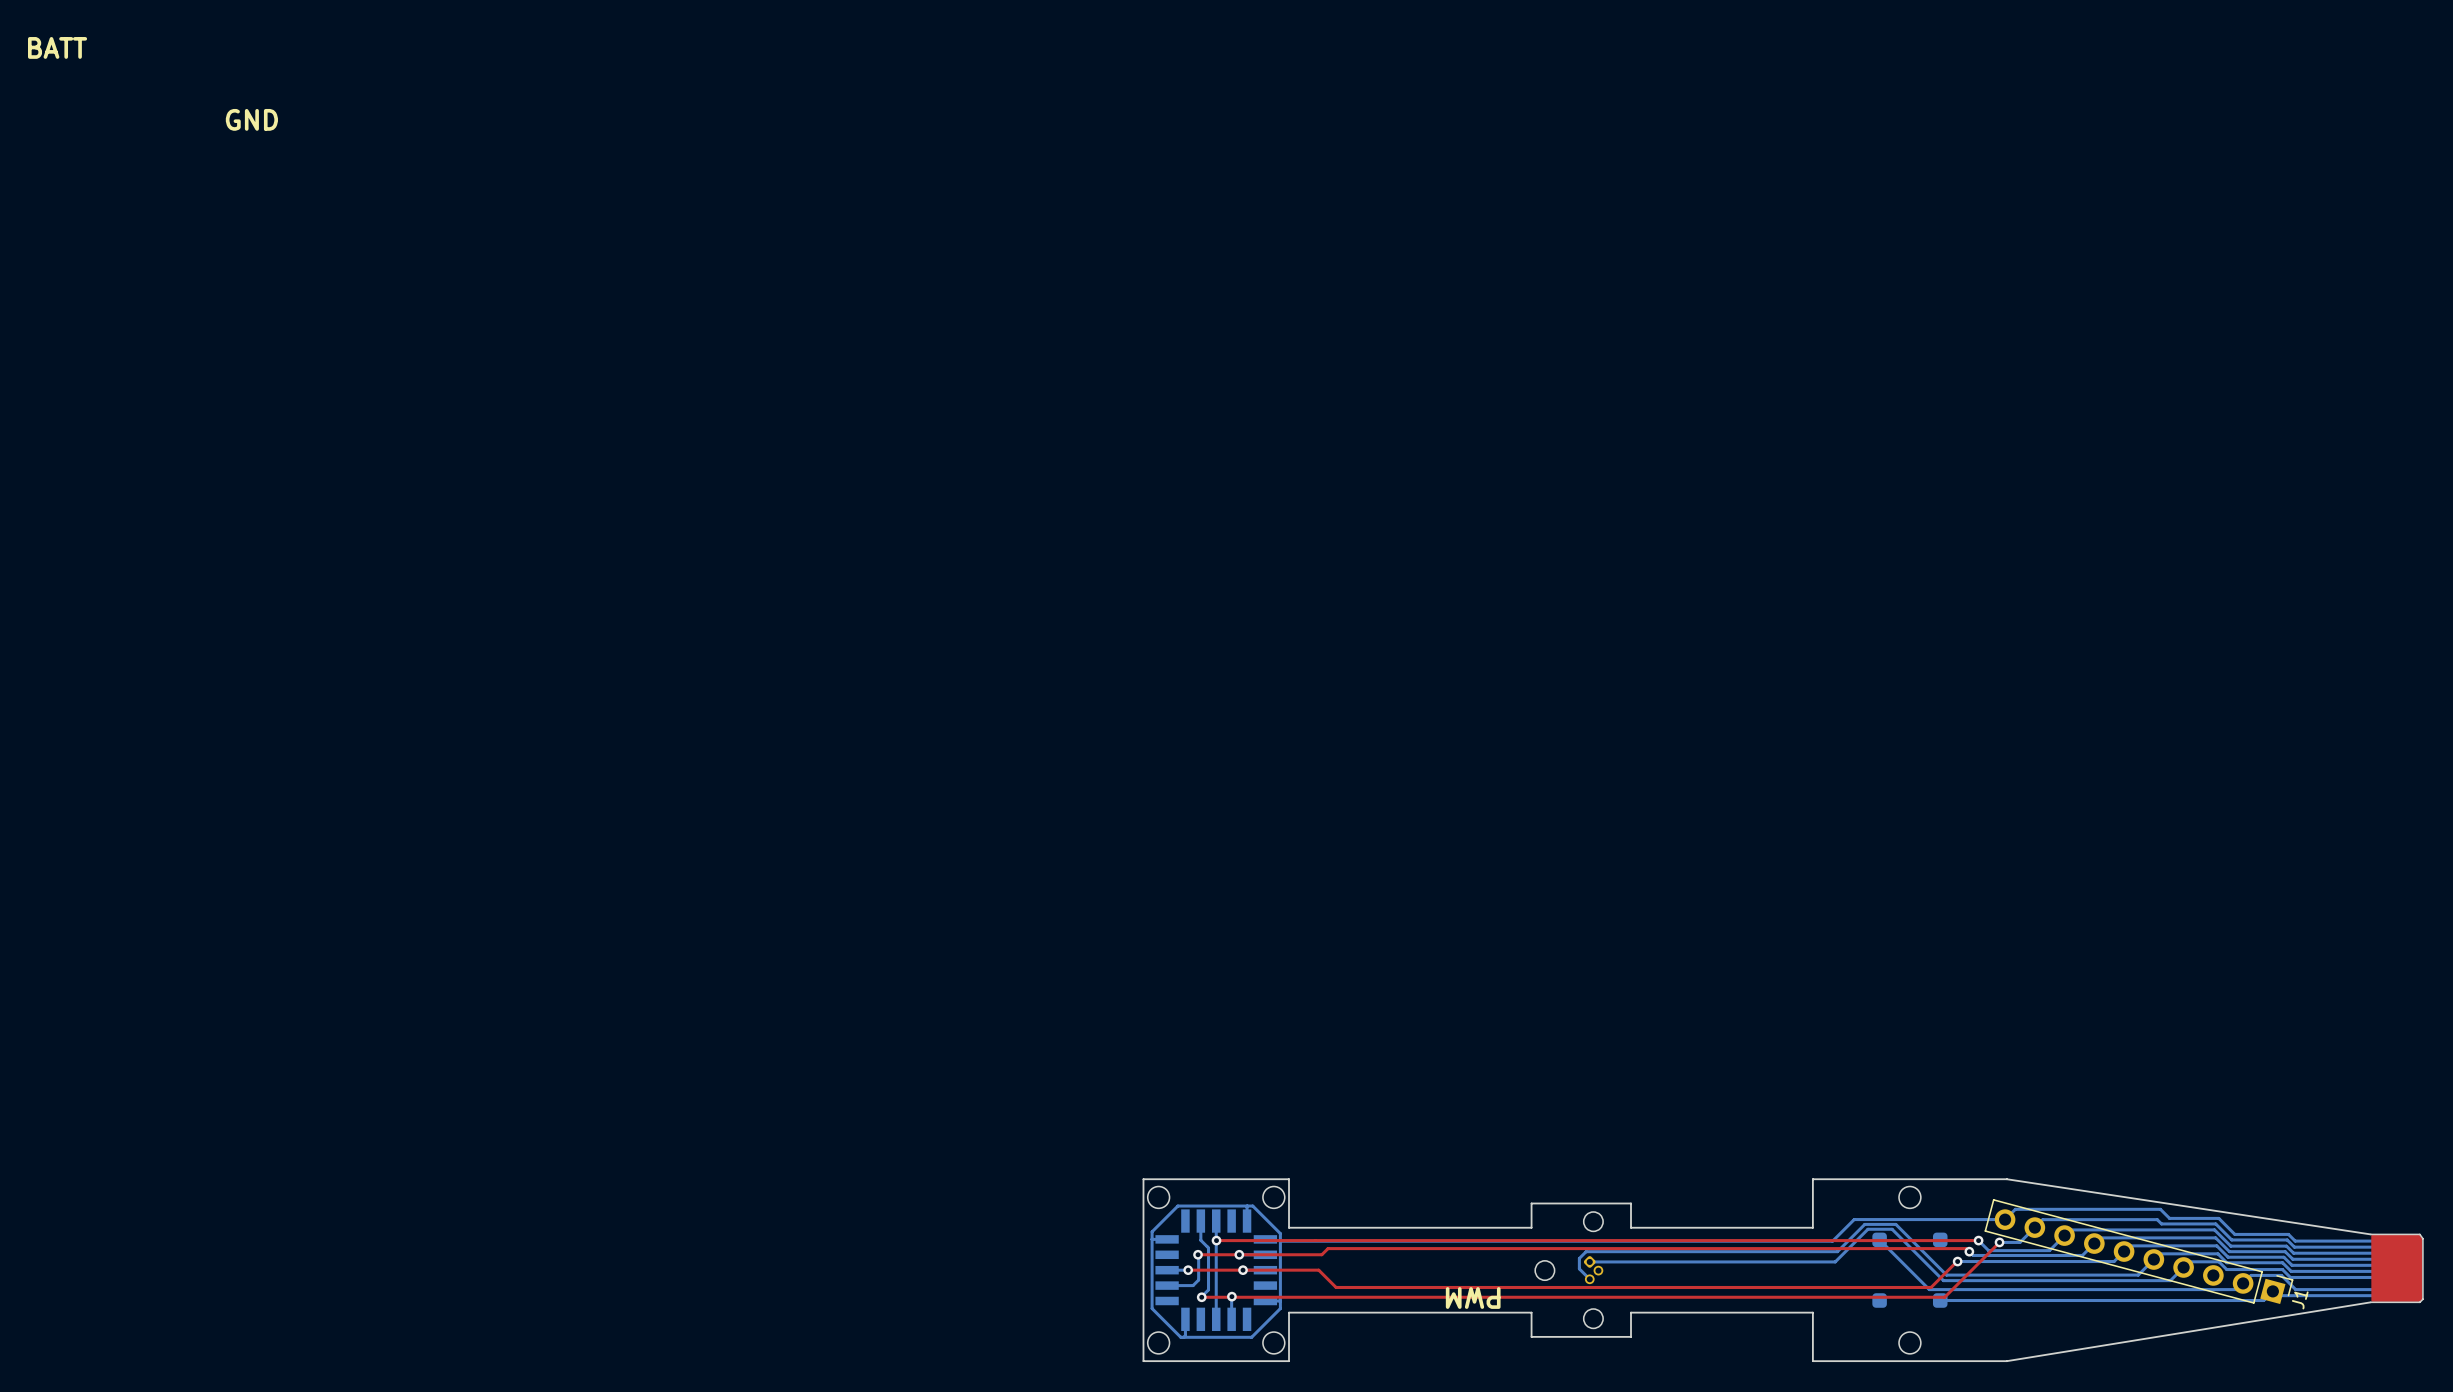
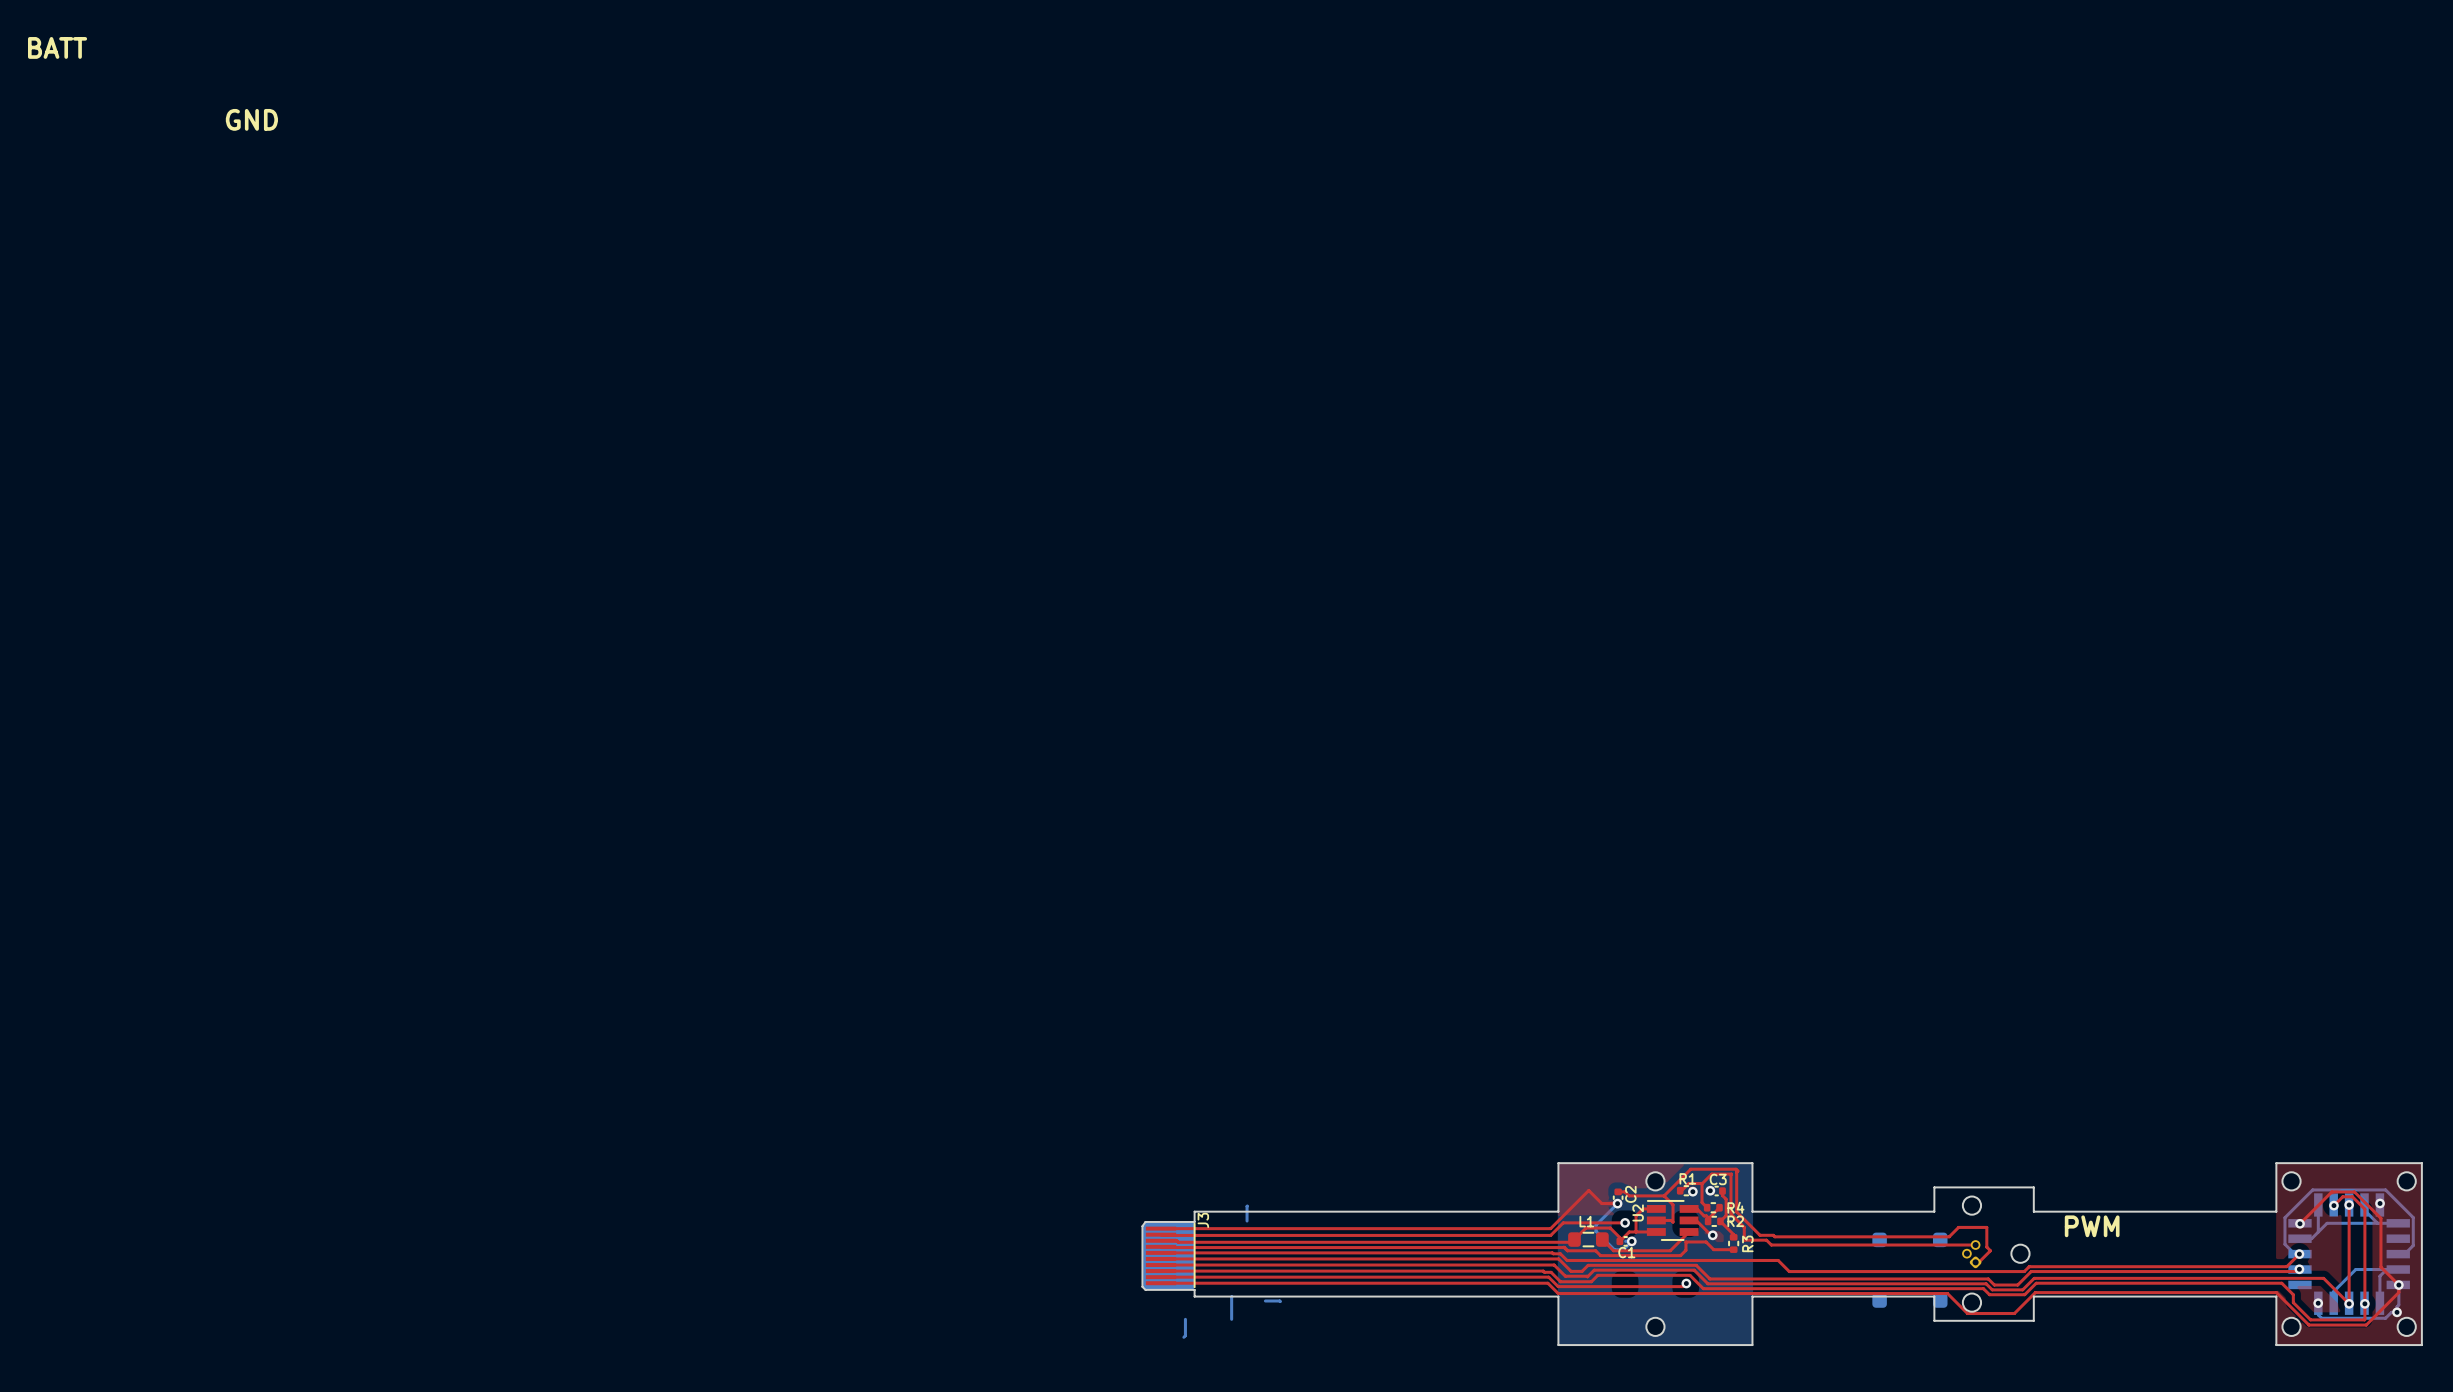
round board edge: none -> [1645, 1171, 1666, 1192]
round board edge: none -> [2281, 1171, 2302, 1192]
round board edge: none -> [2397, 1171, 2417, 1192]
top track: none -> (1702, 1183) (1711, 1174) (1731, 1174) (1730, 1214) (1744, 1227) (1744, 1240) (1766, 1240) (1771, 1245) (1971, 1245)
top track: none -> (1702, 1183) (1702, 1202) (1707, 1207)
top track: none -> (1702, 1183) (1688, 1183) (1681, 1190)
round board edge: [1147, 1185, 1171, 1209] -> none
round board edge: [1262, 1185, 1286, 1209] -> none
round board edge: [1898, 1185, 1922, 1209] -> none
R1: none -> (1686, 1190)
via: none -> (1710, 1190)
top track: none -> (1618, 1191) (1625, 1191) (1629, 1195) (1664, 1195)
via: none -> (1692, 1191)
C3: none -> (1716, 1191)
top track: none -> (1722, 1191) (1722, 1195) (1726, 1199) (1726, 1215) (1720, 1221) (1733, 1234) (1733, 1237)
top track: none -> (1664, 1195) (1673, 1204) (1673, 1222) (1656, 1220)
top track: none -> (1664, 1195) (1690, 1169) (1736, 1169) (1737, 1171) (1736, 1211) (1760, 1235) (1949, 1236) (1958, 1227) (1986, 1227) (1986, 1247) (1990, 1250) (1978, 1262) (1971, 1262)
round board edge: none -> [1962, 1195, 1982, 1216]
C2: none -> (1618, 1197)
bottom track: none -> (1617, 1203) (1596, 1225) (1596, 1231) (1614, 1249) (1623, 1249) (1631, 1241) (1625, 1241)
top track: none -> (1617, 1203) (1601, 1203) (1588, 1190) (1550, 1228) (1161, 1228)
via: none -> (1617, 1203)
via: none -> (2380, 1203)
bottom track: none -> (2318, 1204) (2318, 1232)
top track: none -> (2349, 1204) (2349, 1303) (2323, 1278) (2034, 1278) (2022, 1289) (1992, 1289) (1986, 1283) (1707, 1283) (1694, 1270) (1594, 1270) (1587, 1276) (1565, 1276) (1554, 1265) (1161, 1265)
via: none -> (2349, 1204)
bottom track: none -> (2364, 1204) (2364, 1210) (2377, 1223)
top track: none -> (2333, 1205) (2342, 1196) (2352, 1196) (2364, 1209) (2364, 1319) (2310, 1319) (2293, 1302) (2293, 1294) (2281, 1283) (2036, 1283) (2024, 1294) (1989, 1294) (1983, 1288) (1703, 1288) (1690, 1275) (1597, 1275) (1591, 1281) (1560, 1281) (1551, 1272) (1543, 1271) (1161, 1271)
via: none -> (2333, 1205)
bottom track: (1177, 1206) (1252, 1206) (1280, 1233) (1280, 1308) (1251, 1337) (1180, 1337) (1152, 1308) (1152, 1231) (1177, 1206) -> none
R4: none -> (1713, 1207)
top track: none -> (1719, 1207) (1708, 1219)
top track: none -> (1656, 1208) (1643, 1208) (1636, 1215) (1636, 1231)
top track: none -> (1689, 1208) (1697, 1208) (1708, 1217) (1708, 1221)
round board edge: [1583, 1211, 1604, 1232] -> none
bottom track: (1997, 1219) (1854, 1219) (1832, 1241) (1280, 1241) -> none
bottom track: (2005, 1219) (2015, 1209) (2160, 1209) (2169, 1218) (2218, 1218) (2234, 1234) (2288, 1234) (2295, 1241) (2404, 1241) -> none
U2: none -> (1672, 1220)
top track: none -> (1689, 1220) (1696, 1220) (1712, 1235)
board edge: none -> (1194, 1221) (1194, 1211) (1558, 1211) (1558, 1163) (1752, 1163) (1752, 1211) (1934, 1211) (1934, 1187) (2033, 1187) (2033, 1211) (2276, 1211) (2276, 1163) (2421, 1163) (2421, 1345) (2276, 1345) (2276, 1296) (2033, 1296) (2033, 1320) (1934, 1320) (1934, 1296) (1752, 1296) (1752, 1345) (1558, 1345) (1558, 1296) (1194, 1296) (1194, 1289)
bottom track: (1200, 1221) (1200, 1240) (1208, 1247) (1208, 1289) (1201, 1296) -> none
bottom track: (1216, 1221) (1216, 1319) -> none
R2: none -> (1714, 1221)
top track: none -> (1625, 1222) (1563, 1222) (1550, 1235) (1161, 1234)
via: none -> (1625, 1222)
top track: none -> (2300, 1223) (2331, 1191) (2354, 1191) (2380, 1218) (2380, 1267) (2398, 1285) (2398, 1292) (2366, 1325) (2308, 1325) (2276, 1292) (2035, 1292) (2014, 1313) (1967, 1313) (1947, 1293) (1558, 1293) (1547, 1283) (1161, 1283)
via: none -> (2300, 1223)
bottom track: none -> (2398, 1223) (2327, 1223) (2311, 1238) (2299, 1238)
text: none -> PWM (2092, 1226)
top track: none -> (1656, 1231) (1629, 1231) (1619, 1241) (1619, 1237) (1610, 1228) (1586, 1228) (1571, 1242) (1161, 1240)
top track: none -> (1689, 1231) (1670, 1250) (1613, 1250) (1602, 1239)
board edge: (2370, 1234) (2006, 1179) (1812, 1179) (1812, 1227) (1631, 1227) (1631, 1203) (1531, 1203) (1531, 1227) (1289, 1227) (1289, 1179) (1143, 1179) (1143, 1361) (1289, 1361) (1289, 1312) (1531, 1312) (1531, 1336) (1631, 1336) (1631, 1312) (1812, 1312) (1812, 1361) (2006, 1361) (2370, 1302) -> none
via: none -> (1712, 1235)
L1: none -> (1588, 1239)
bottom track: (1879, 1239) (1929, 1289) (2236, 1289) (2251, 1275) (2281, 1275) (2295, 1289) (2404, 1289) -> none
top track: (1216, 1240) (1978, 1240) -> none
via: (1216, 1240) -> none
bottom track: (1978, 1240) (1988, 1250) (2049, 1250) (2070, 1229) (2214, 1229) (2230, 1246) (2286, 1246) (2293, 1253) (2404, 1253) -> none
via: (1978, 1240) -> none
C1: none -> (1625, 1241)
via: none -> (1631, 1241)
bottom track: (1999, 1242) (2020, 1242) (2042, 1219) (2157, 1219) (2161, 1223) (2215, 1223) (2231, 1239) (2287, 1239) (2294, 1247) (2404, 1247) -> none
top track: (1999, 1242) (1944, 1297) (1201, 1297) -> none
via: (1999, 1242) -> none
R3: none -> (1733, 1243)
round board edge: none -> [2010, 1244, 2031, 1264]
top track: none -> (1161, 1246) (1564, 1247)
top track: none -> (1563, 1247) (1567, 1250) (1595, 1250) (1600, 1255) (1680, 1255) (1685, 1250) (1685, 1241) (1706, 1241) (1713, 1249) (1733, 1249)
bottom track: (1969, 1251) (1973, 1255) (2082, 1255) (2100, 1237) (2215, 1237) (2229, 1251) (2285, 1251) (2292, 1259) (2404, 1259) -> none
top track: (1969, 1251) (1966, 1248) (1328, 1248) (1321, 1254) (1198, 1254) -> none
via: (1969, 1251) -> none
J1: (2138, 1251) -> none
top track: none -> (1161, 1252) (1552, 1252) (1560, 1253) (1567, 1260) (1778, 1260) (1789, 1271) (2024, 1271) (2029, 1266) (2286, 1266) (2299, 1254)
via: (1198, 1254) -> none
bottom track: (1201, 1254) (1198, 1254) (1198, 1280) (1193, 1285) (1167, 1285) -> none
via: (1239, 1254) -> none
part: none -> (1971, 1254)
bottom track: none -> (2299, 1254) (2294, 1254) (2284, 1244) (2284, 1217) (2312, 1189) (2385, 1189) (2413, 1217) (2413, 1245) (2404, 1254) (2398, 1254)
via: none -> (2299, 1254)
part: none -> (2349, 1254)
J3: none -> (1168, 1255)
top track: none -> (1161, 1258) (1558, 1258) (1571, 1271) (1582, 1271) (1588, 1265) (1696, 1265) (1709, 1278) (1988, 1278) (1994, 1285) (2017, 1285) (2031, 1271) (2297, 1271) (2299, 1269)
round board edge: [1534, 1260, 1556, 1281] -> none
top track: (1957, 1260) (1931, 1287) (1336, 1287) (1318, 1270) (1188, 1270) -> none
bottom track: (1589, 1261) (1835, 1261) (1867, 1229) (1892, 1229) (1943, 1280) (2170, 1280) (2189, 1261) (2219, 1261) (2226, 1269) (2282, 1269) (2290, 1277) (2404, 1277) -> none
bottom track: (1957, 1261) (2114, 1261) (2129, 1245) (2216, 1245) (2228, 1257) (2283, 1257) (2292, 1265) (2404, 1265) -> none
via: (1957, 1261) -> none
part: (2396, 1268) -> none
via: none -> (2299, 1269)
bottom track: none -> (2386, 1269) (2379, 1276) (2379, 1303)
bottom track: none -> (2398, 1269) (2355, 1269) (2333, 1291) (2333, 1303)
via: (1188, 1270) -> none
part: (1216, 1270) -> none
via: (1243, 1270) -> none
part: (1593, 1270) -> none
bottom track: (2404, 1271) (2291, 1271) (2282, 1262) (2226, 1262) (2217, 1253) (2159, 1253) (2138, 1275) (1946, 1275) (1895, 1224) (1864, 1224) (1837, 1251) (1586, 1251) (1579, 1258) (1579, 1268) (1589, 1279) -> none
top track: none -> (1161, 1277) (1548, 1277) (1558, 1286) (1683, 1286) (1686, 1283)
via: none -> (1686, 1283)
bottom track: none -> (2398, 1285) (2397, 1312) (2391, 1312) (2385, 1318) (2321, 1318) (2318, 1314) (2318, 1303)
via: none -> (2398, 1285)
round board edge: none -> [1962, 1292, 1982, 1313]
bottom track: (1945, 1295) (1940, 1300) (2263, 1300) (2272, 1291) (2277, 1295) (2404, 1295) -> none
via: (1231, 1296) -> none
via: (1201, 1297) -> none
text: PWM (1473, 1297) -> none
via: none -> (2318, 1303)
via: none -> (2349, 1303)
via: none -> (2364, 1303)
round board edge: [1583, 1308, 1604, 1330] -> none
via: none -> (2397, 1312)
round board edge: none -> [1645, 1317, 1666, 1337]
round board edge: none -> [2281, 1317, 2302, 1337]
round board edge: none -> [2397, 1317, 2417, 1337]
round board edge: [1147, 1331, 1171, 1355] -> none
round board edge: [1262, 1331, 1286, 1355] -> none
round board edge: [1898, 1331, 1922, 1355] -> none

